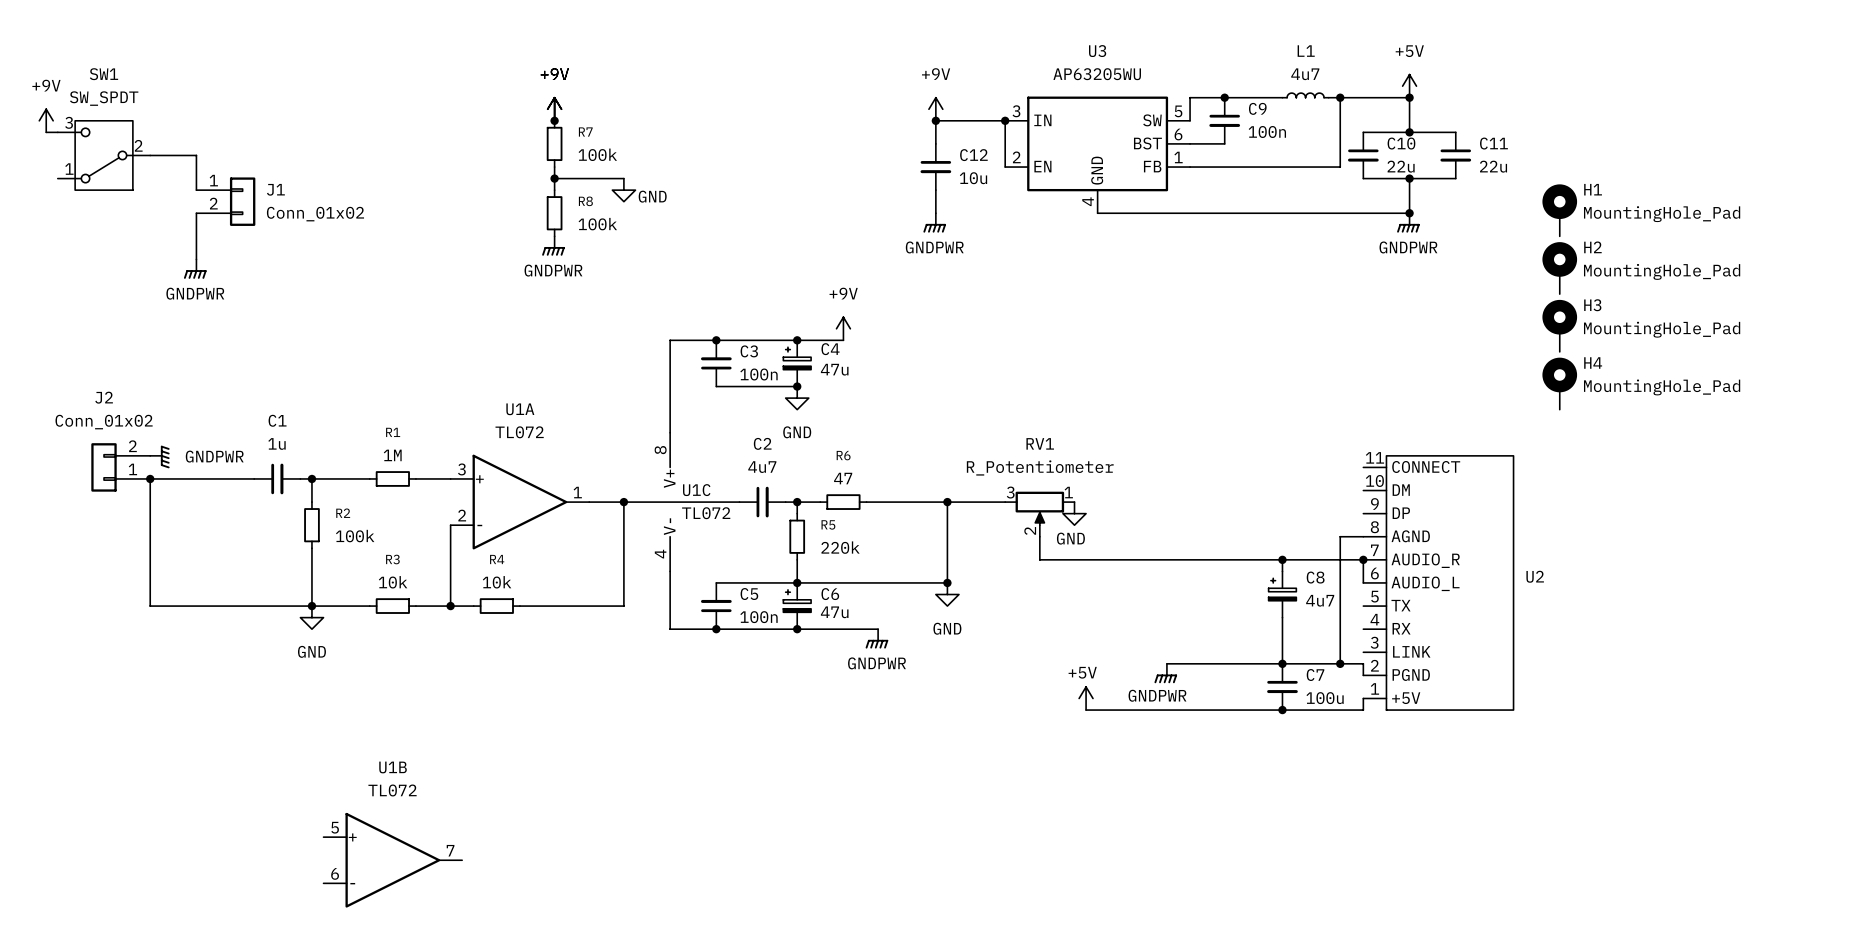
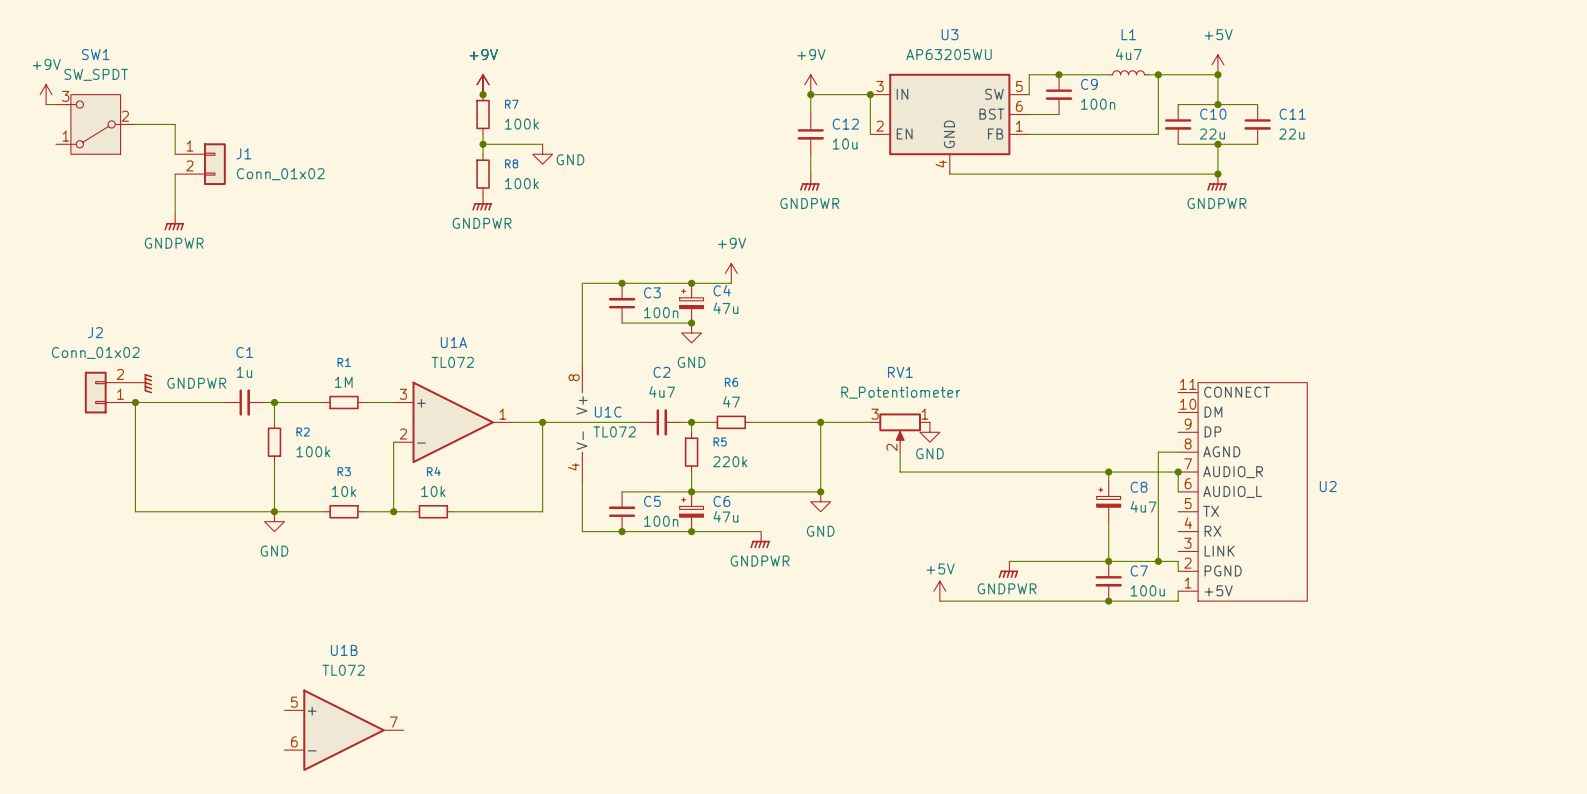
H1: MountingHole_Pad (1559, 210) -> none
H2: MountingHole_Pad (1559, 268) -> none
H3: MountingHole_Pad (1559, 325) -> none
H4: MountingHole_Pad (1559, 383) -> none

